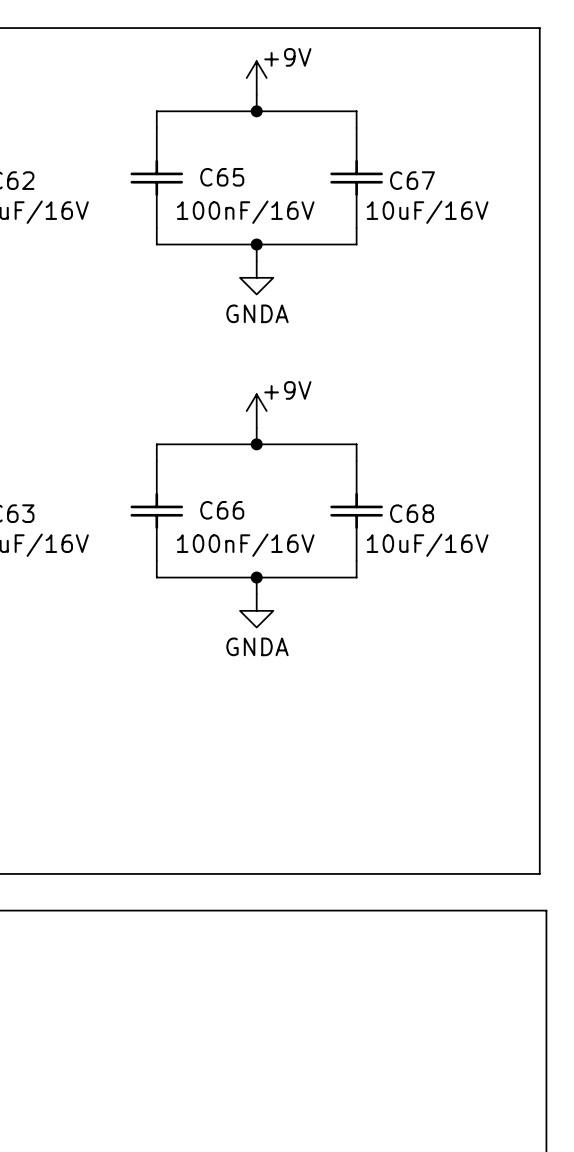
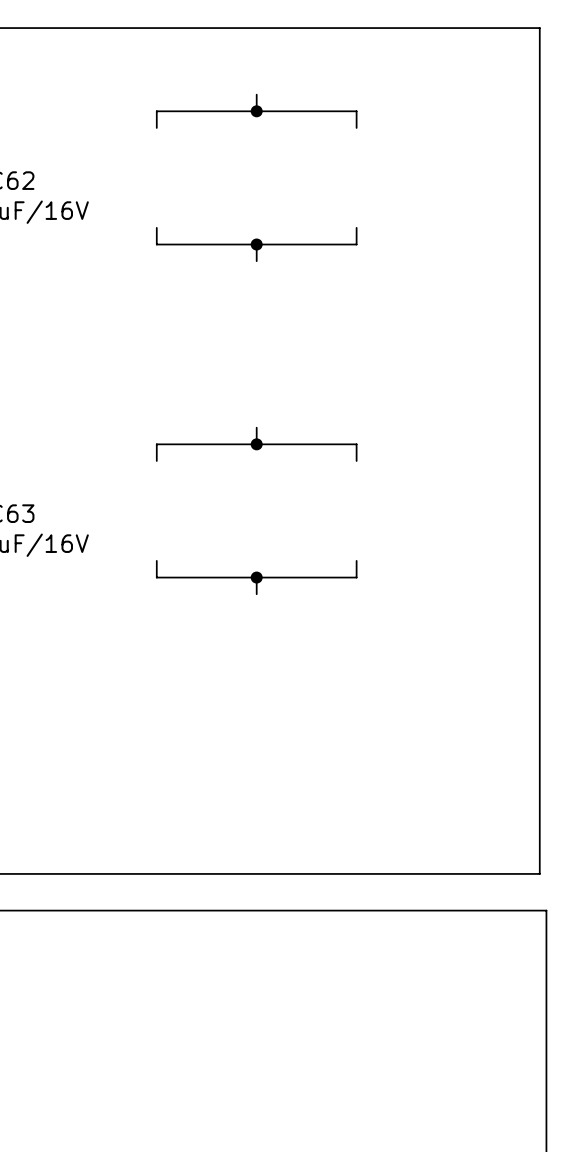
power symbol: +9V (256, 78) -> none
C65: 100nF/16V (156, 177) -> none
C67: 10uF/16V (356, 177) -> none
power symbol: GNDA (256, 277) -> none
power symbol: +9V (256, 411) -> none
C66: 100nF/16V (156, 510) -> none
C68: 10uF/16V (356, 510) -> none
power symbol: GNDA (256, 610) -> none

